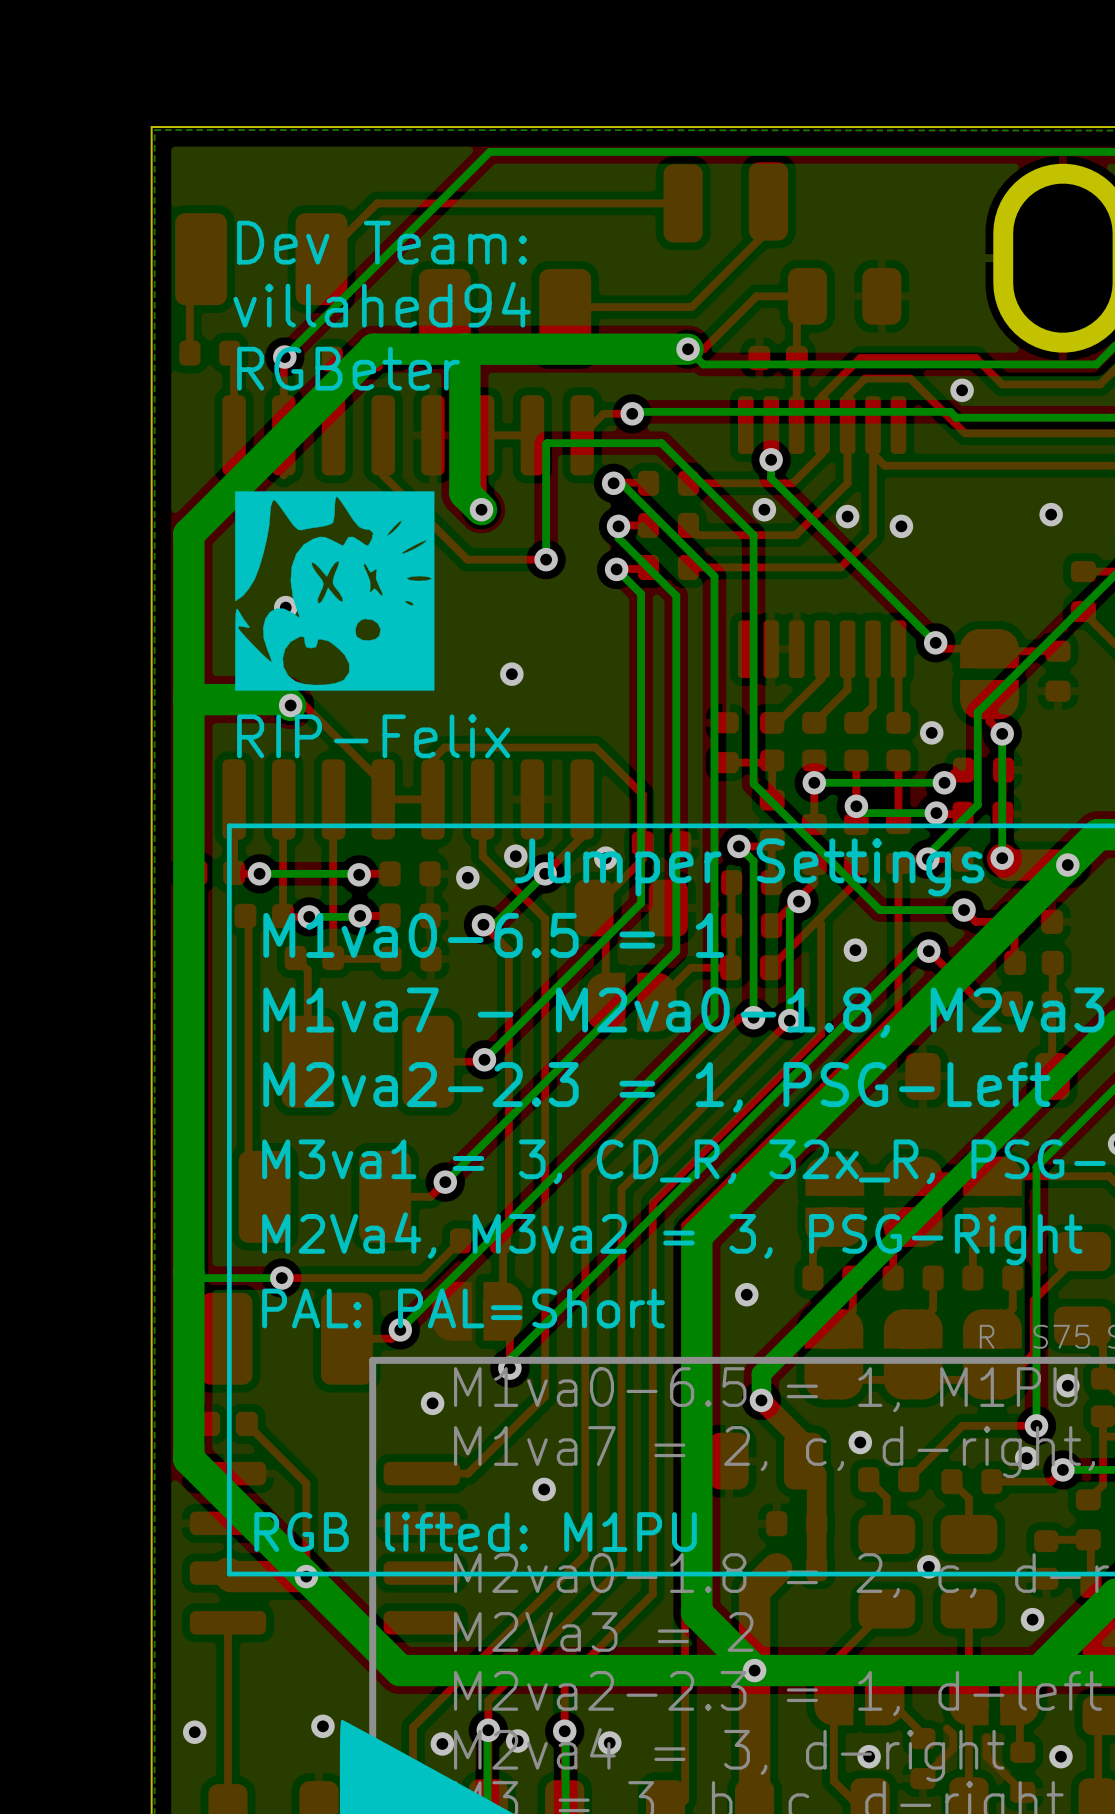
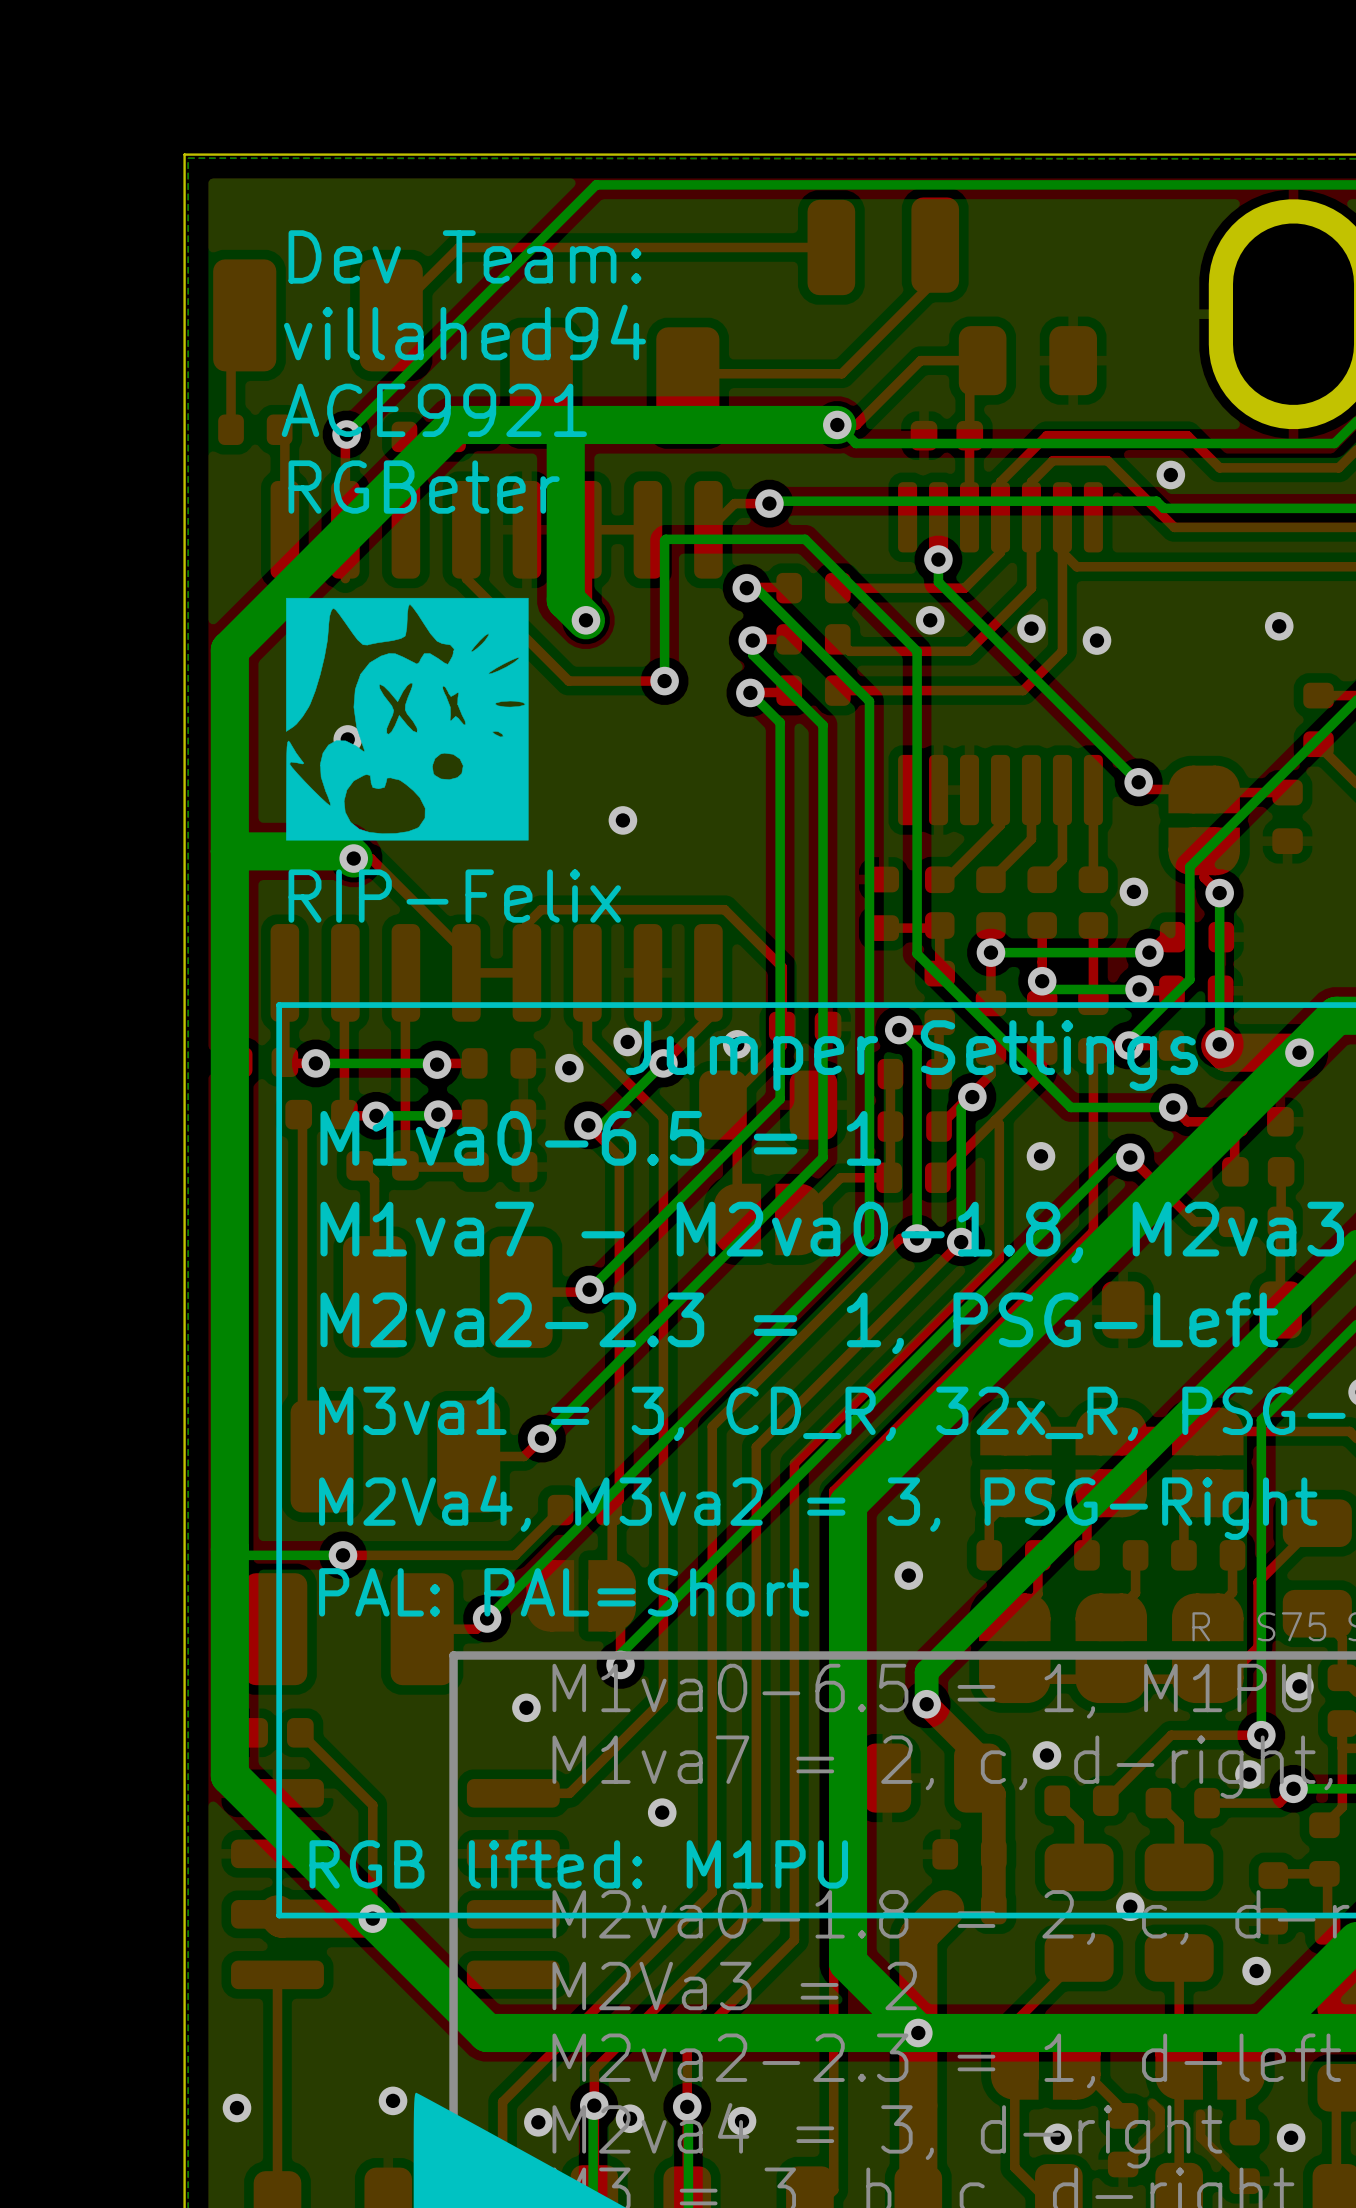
text position: Dev Team: (382, 242) -> Dev Team: (464, 256)
text position: villahed94 (382, 304) -> villahed94 (464, 332)
text: none -> ACE9921 (434, 410)
text position: RGBeter (348, 368) -> RGBeter (424, 487)

